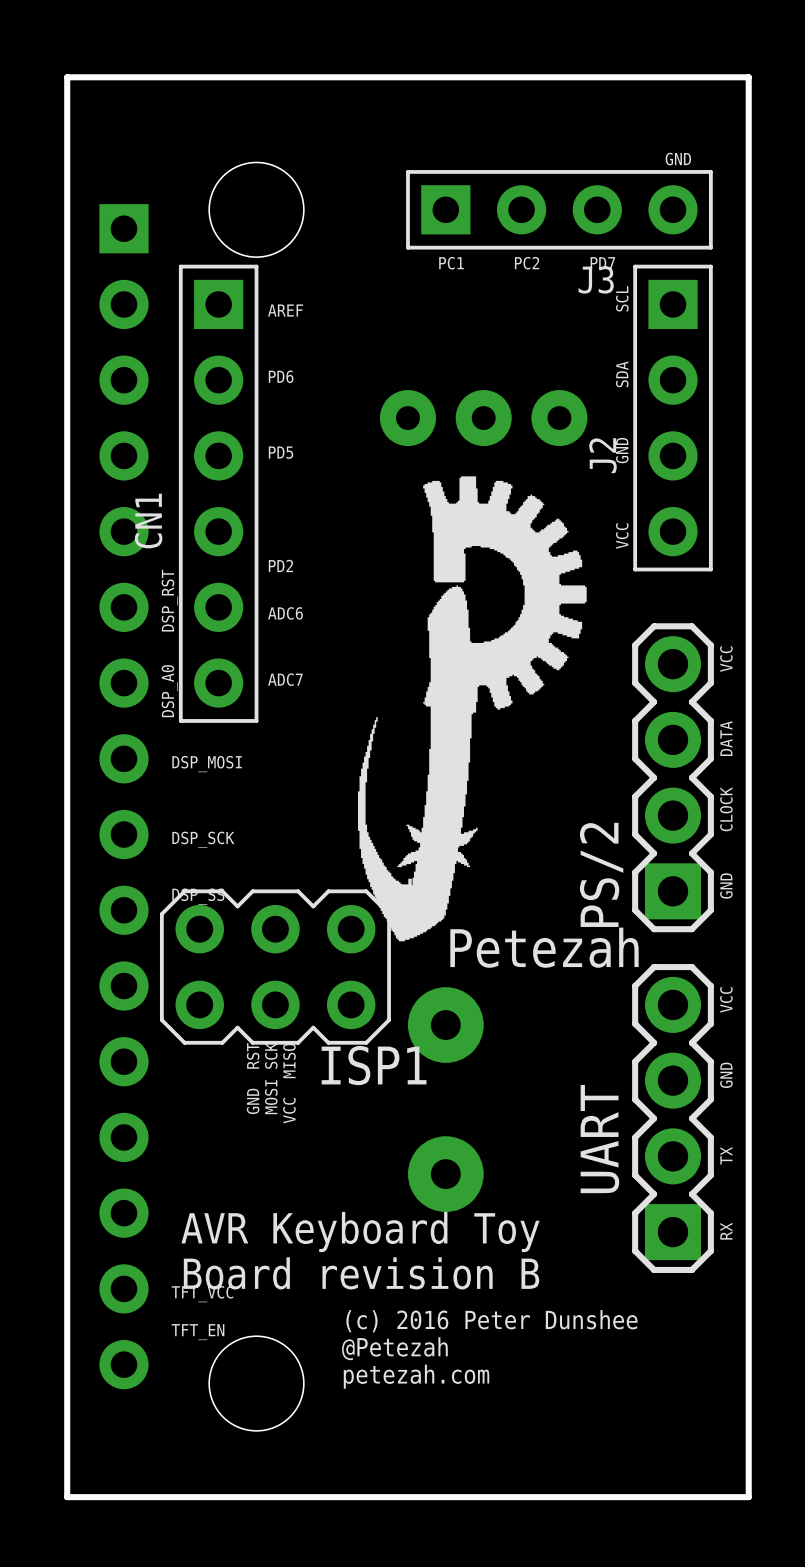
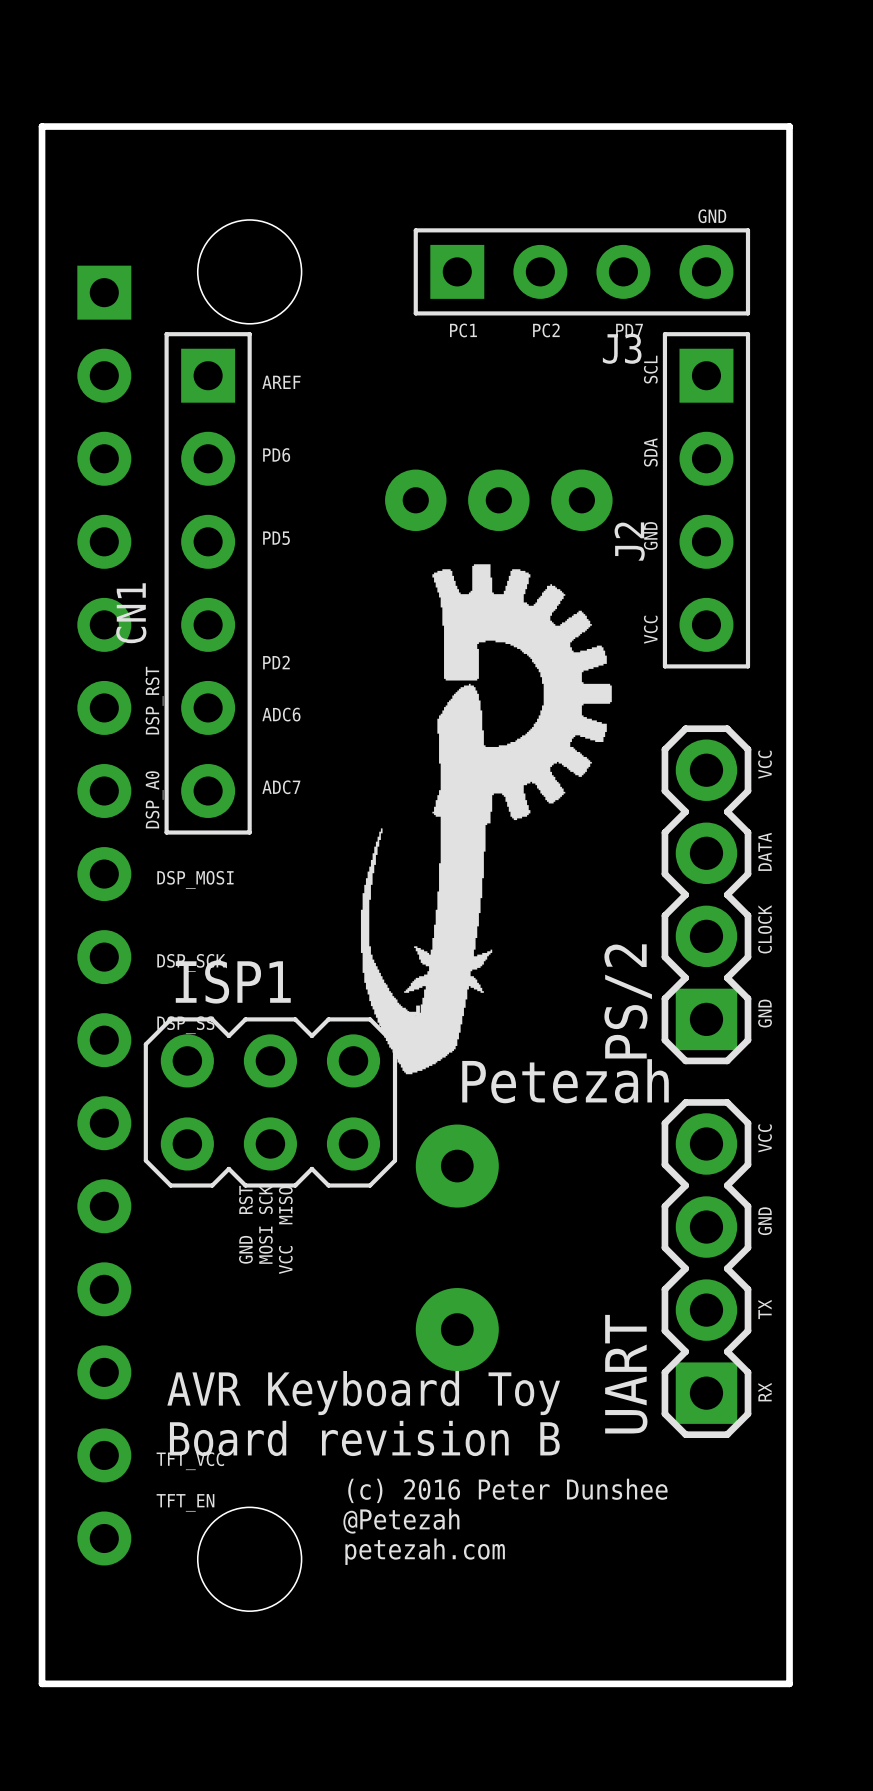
ISP1 name position: ISP1 (374, 1065) -> ISP1 (233, 982)
UART name position: UART (599, 1139) -> UART (626, 1374)

